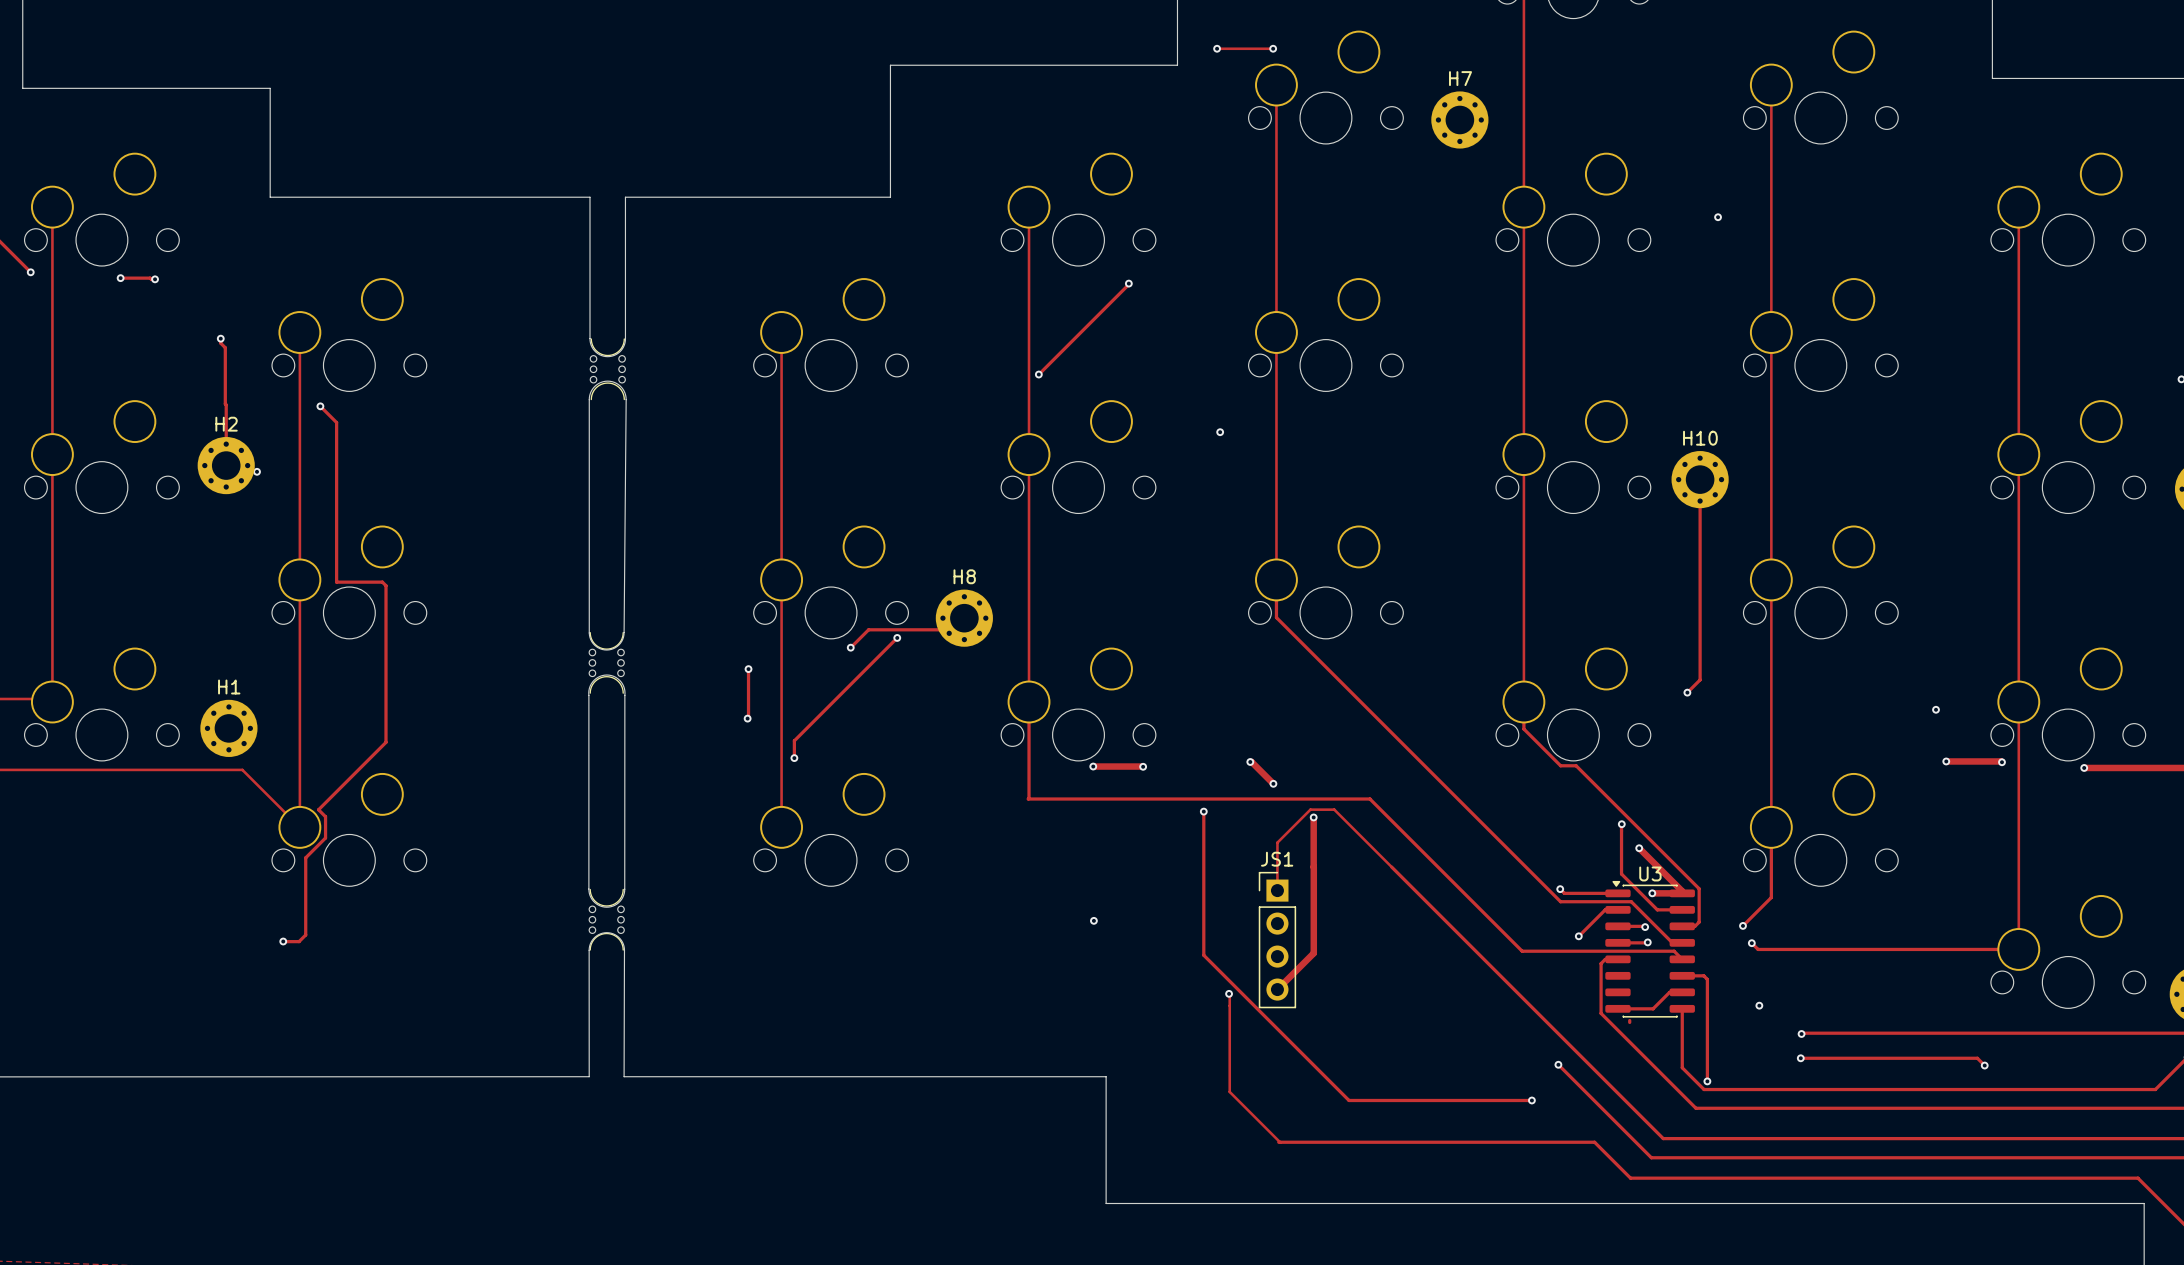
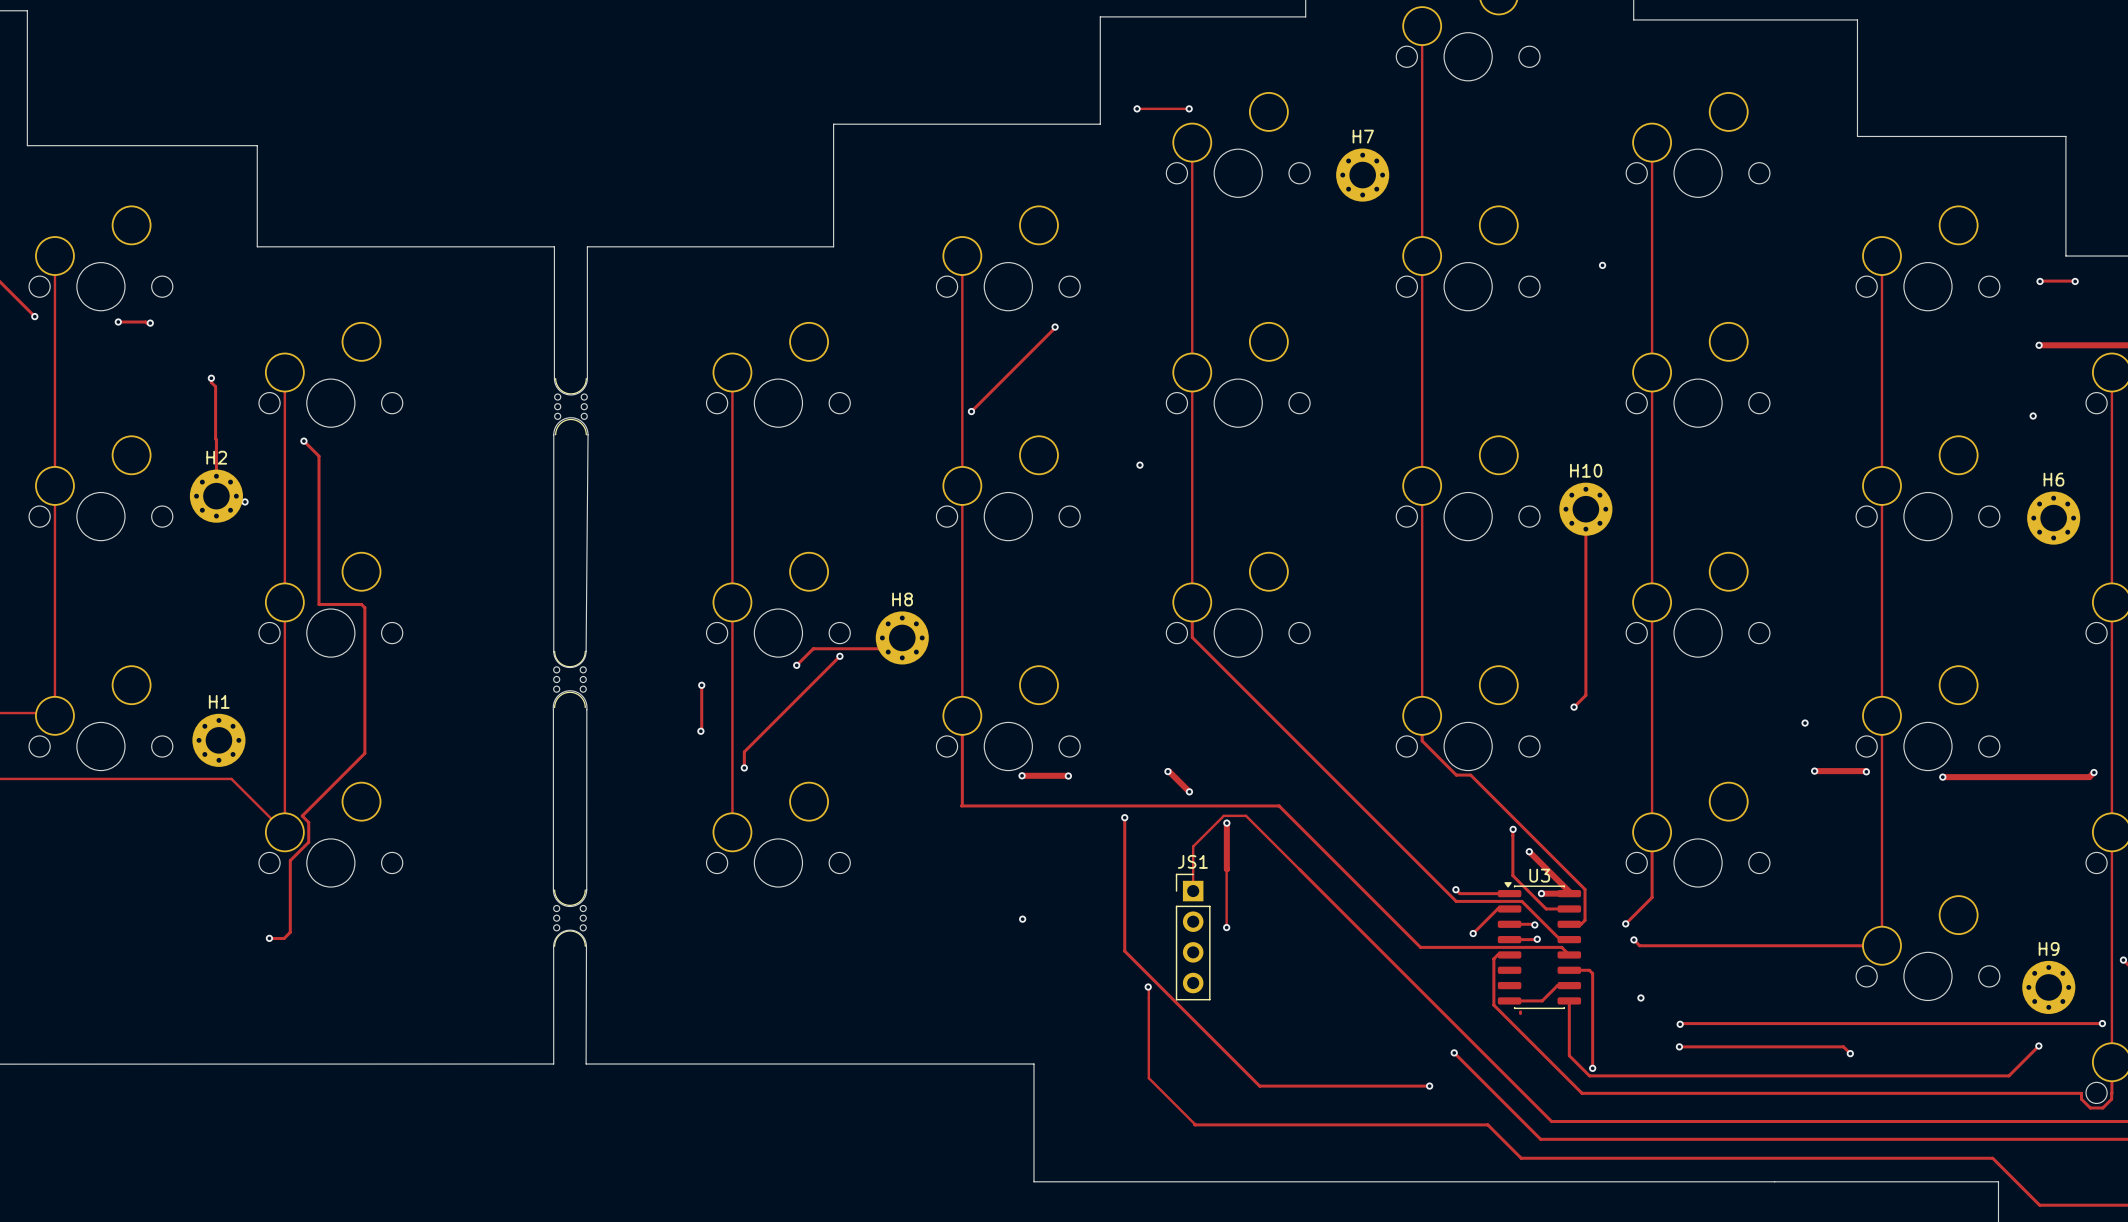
track: (1313, 867) (1313, 953) (1277, 989) -> (1226, 869) (1226, 927)
via: none -> (1226, 927)

